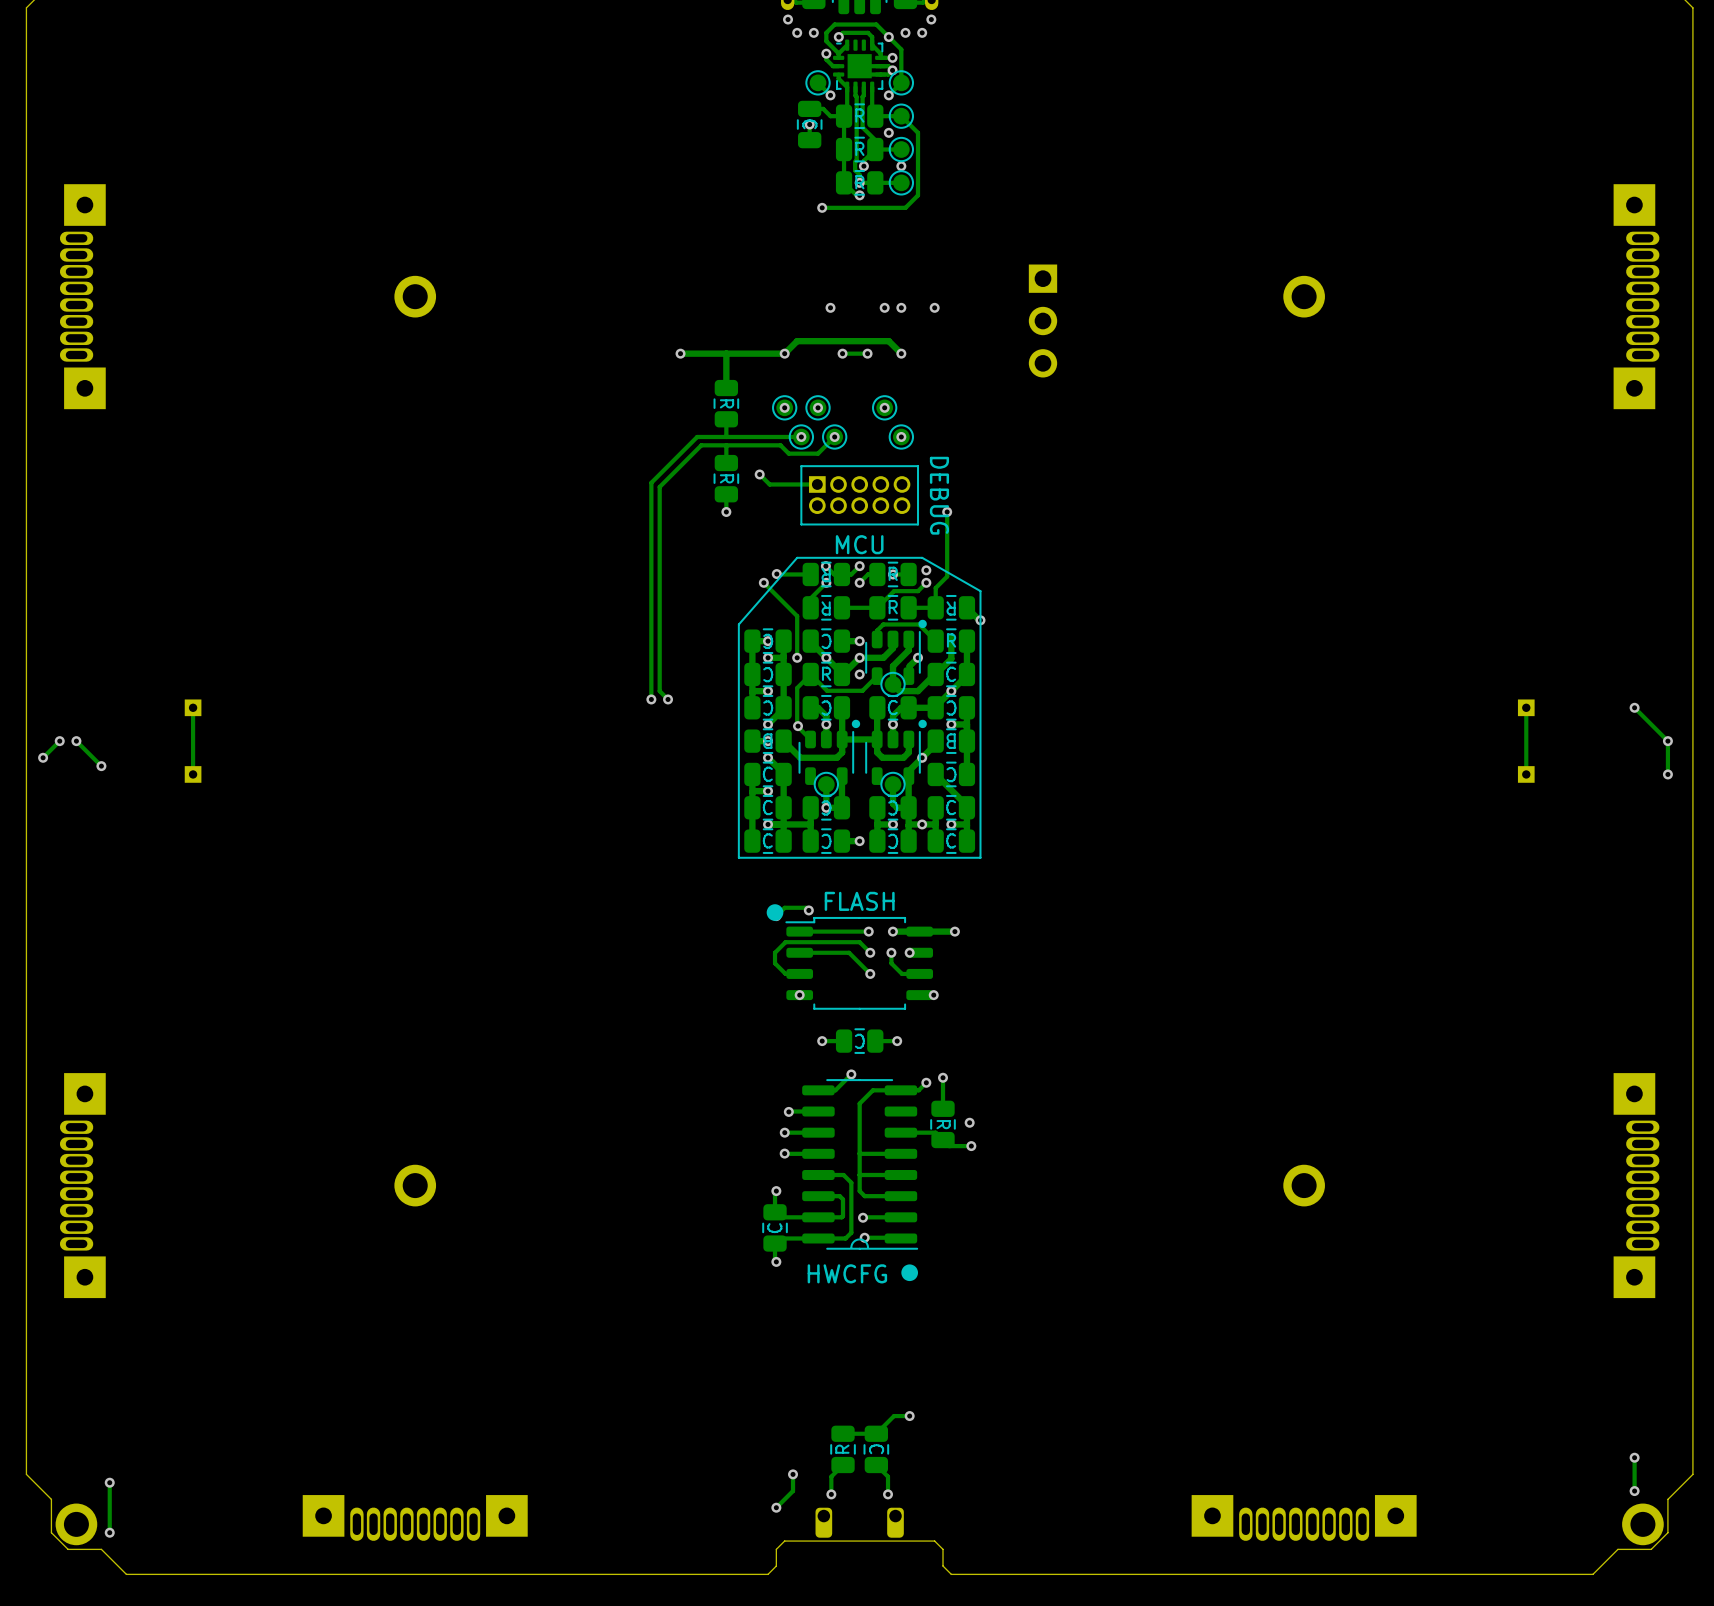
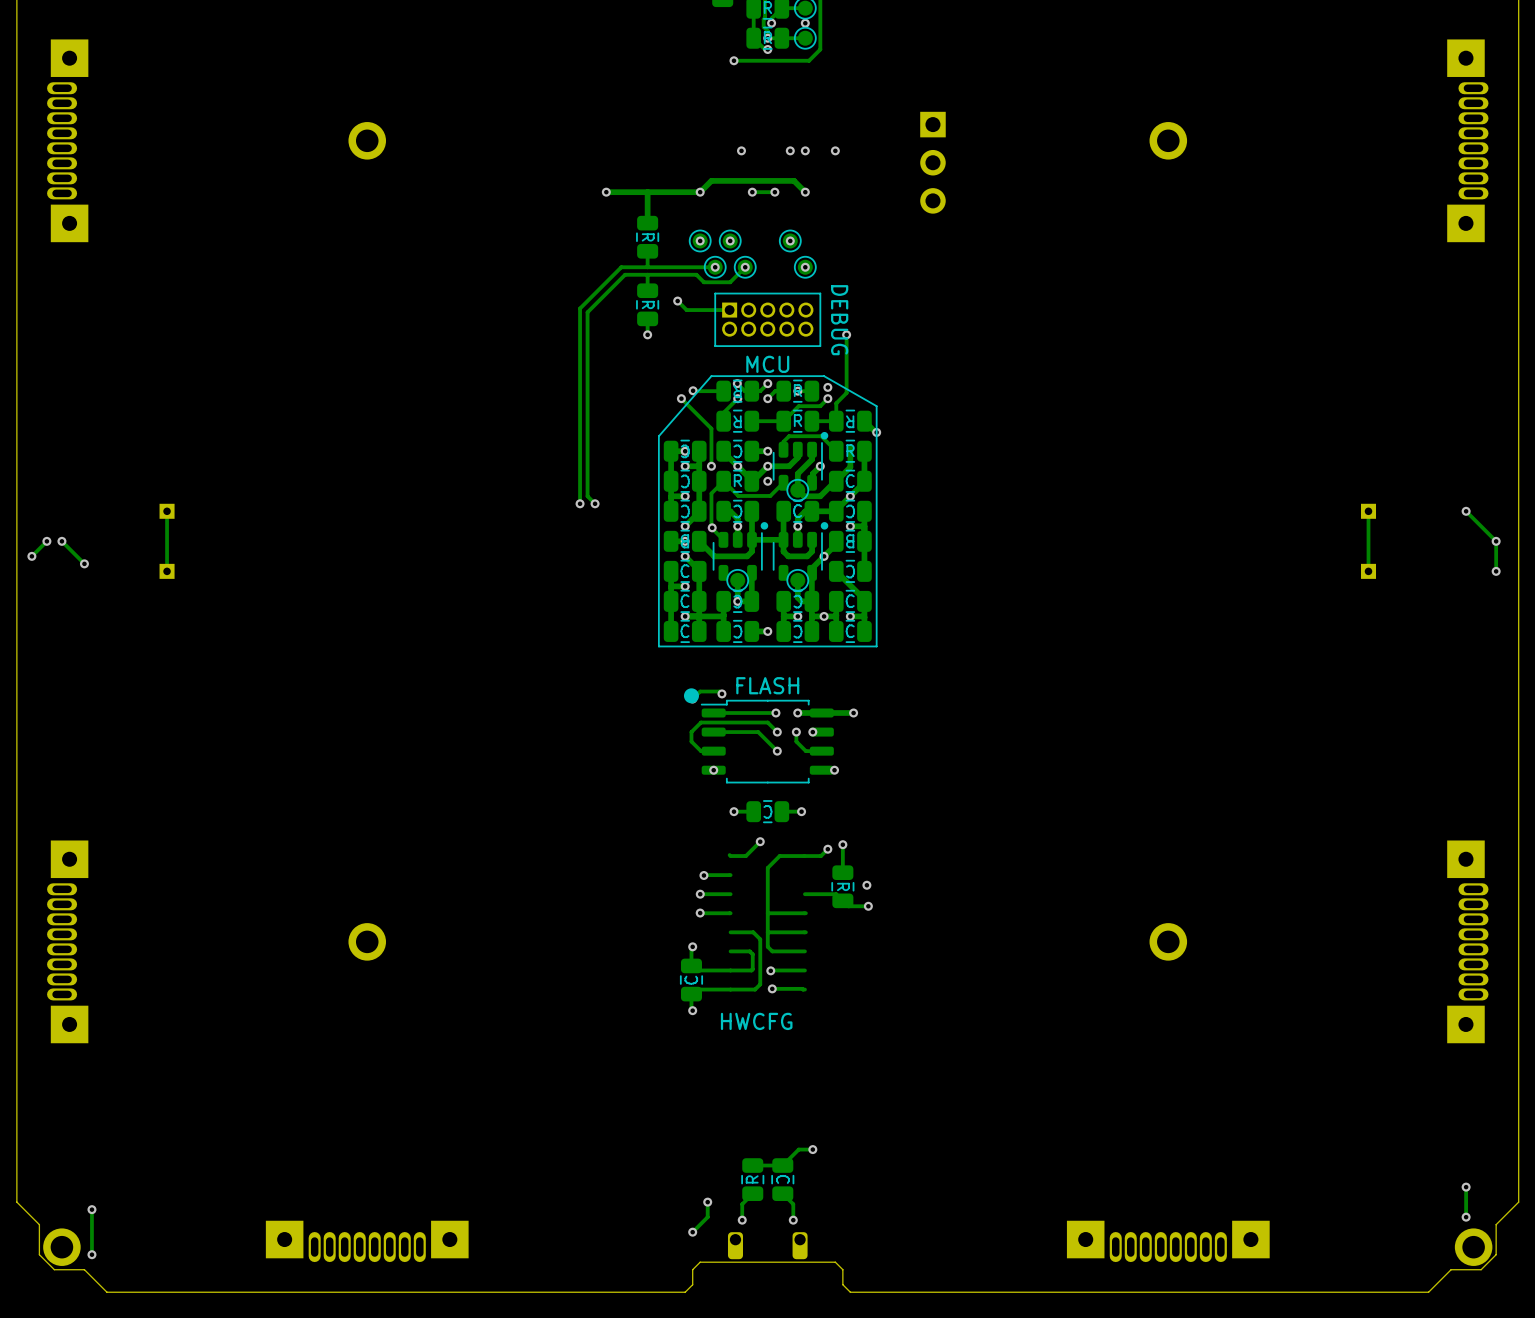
part: (860, 1180) -> none

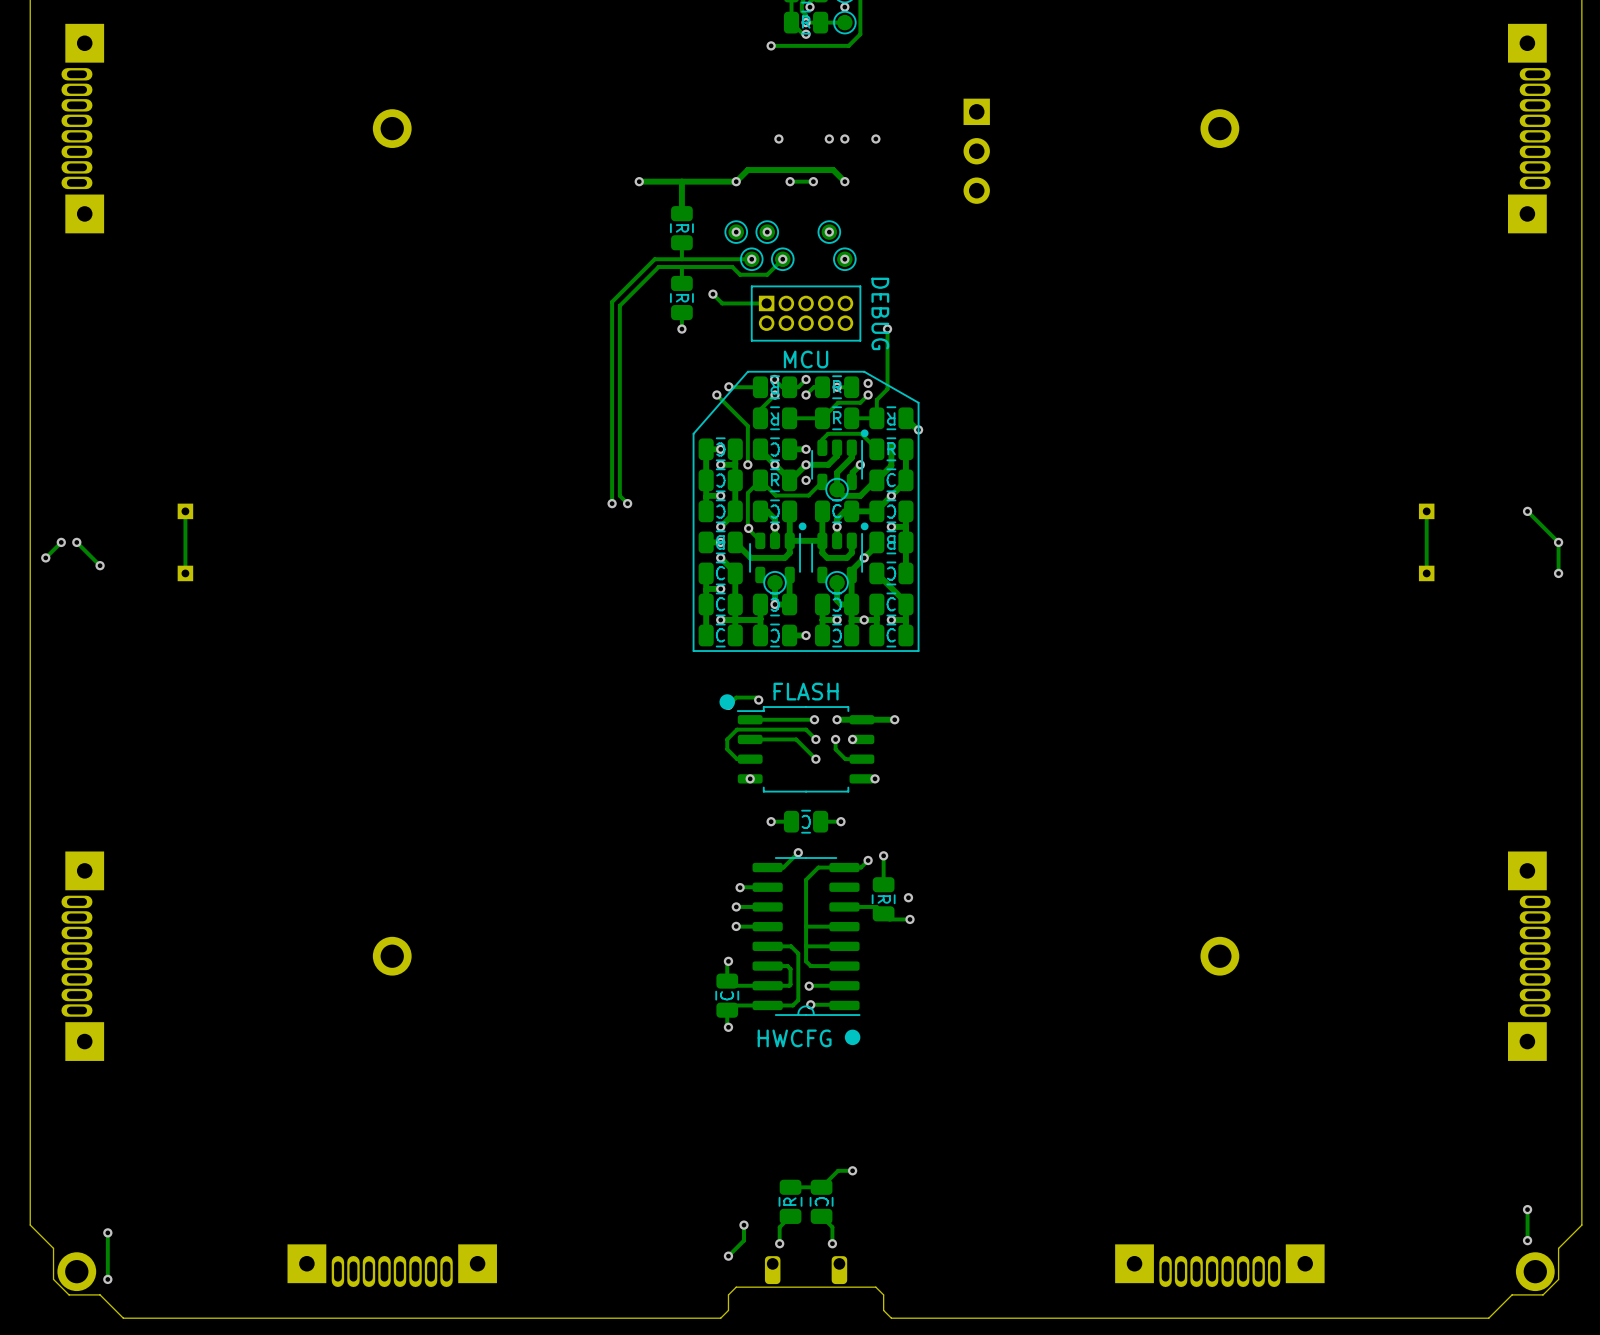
part: none -> (806, 951)

